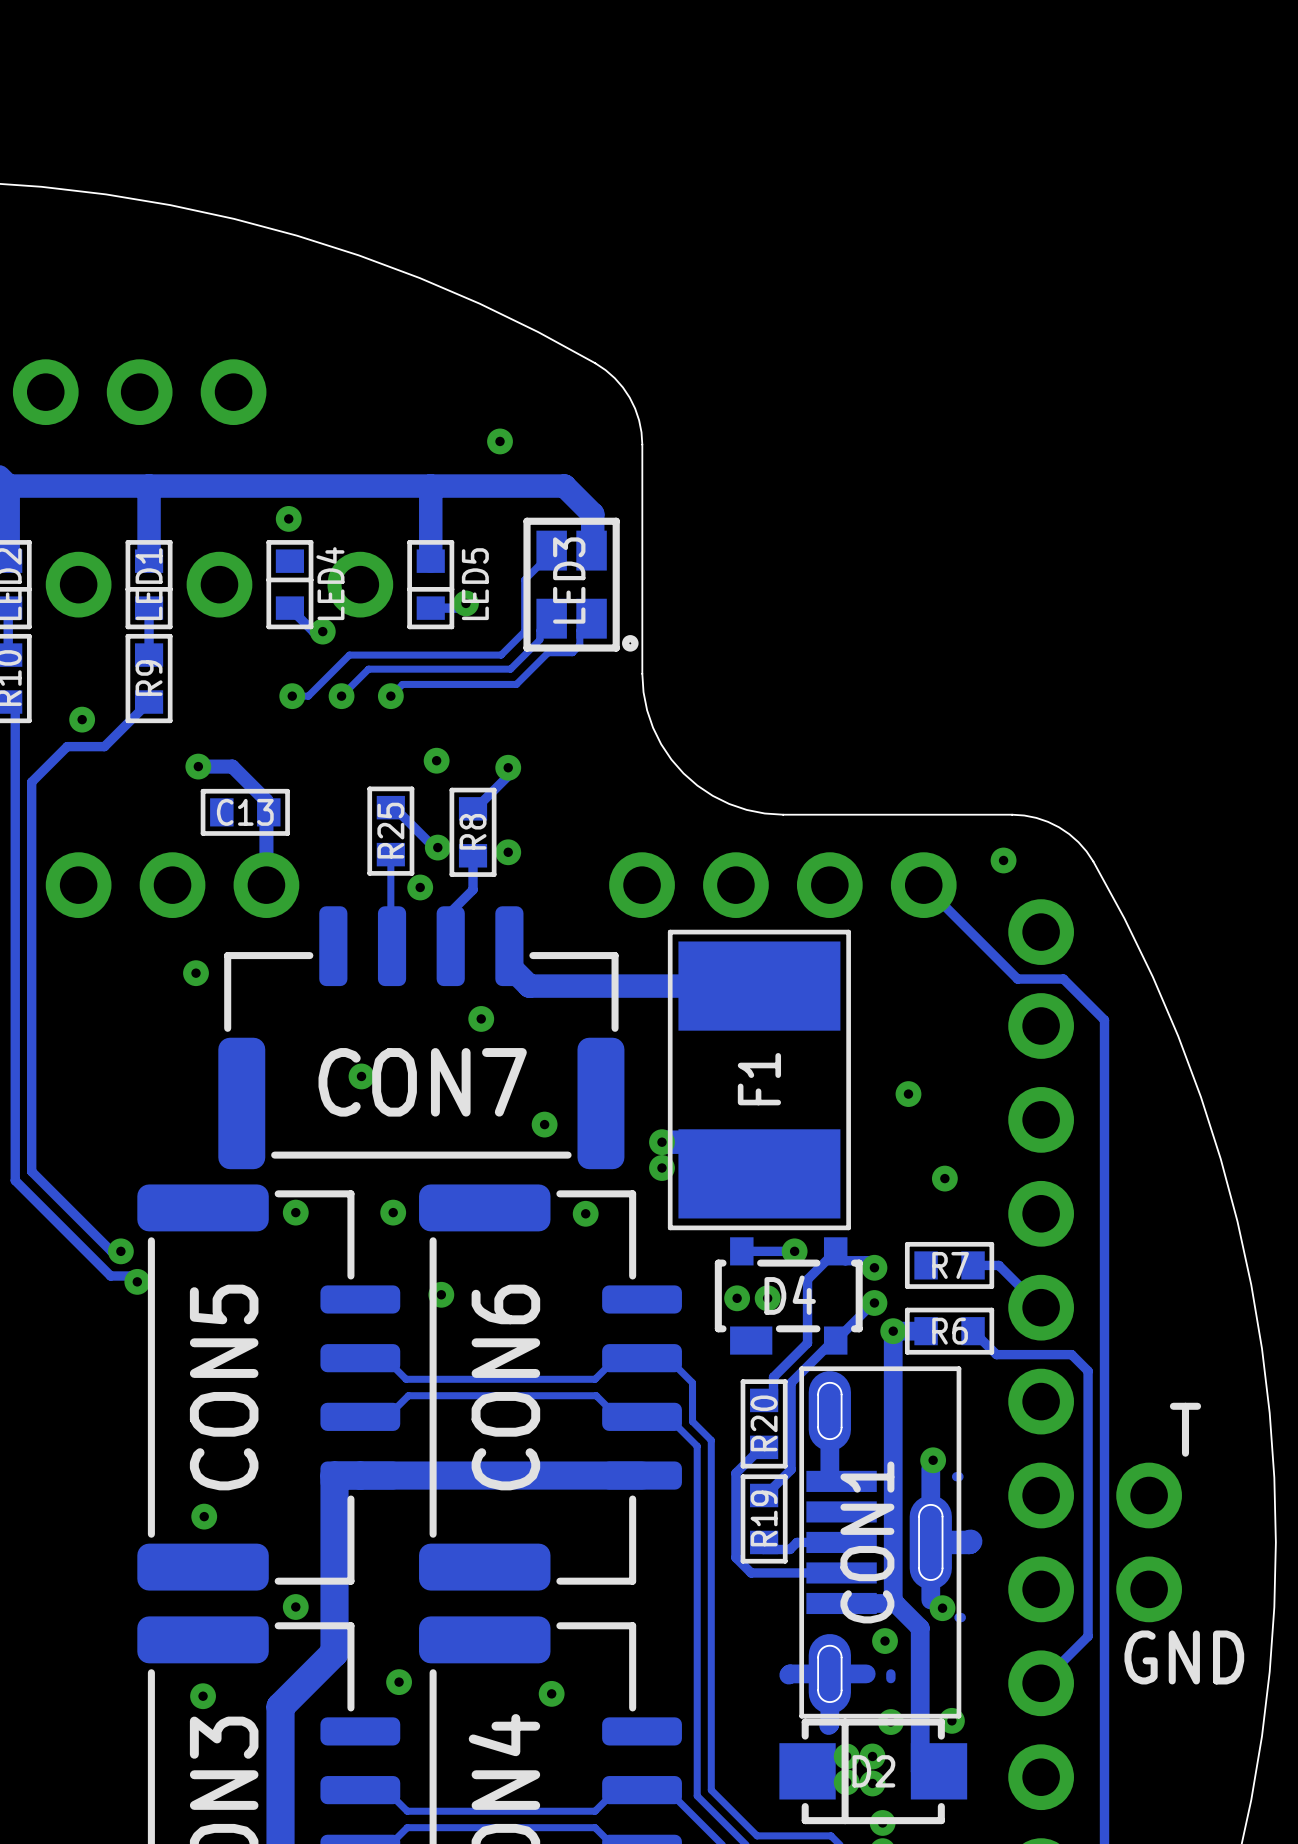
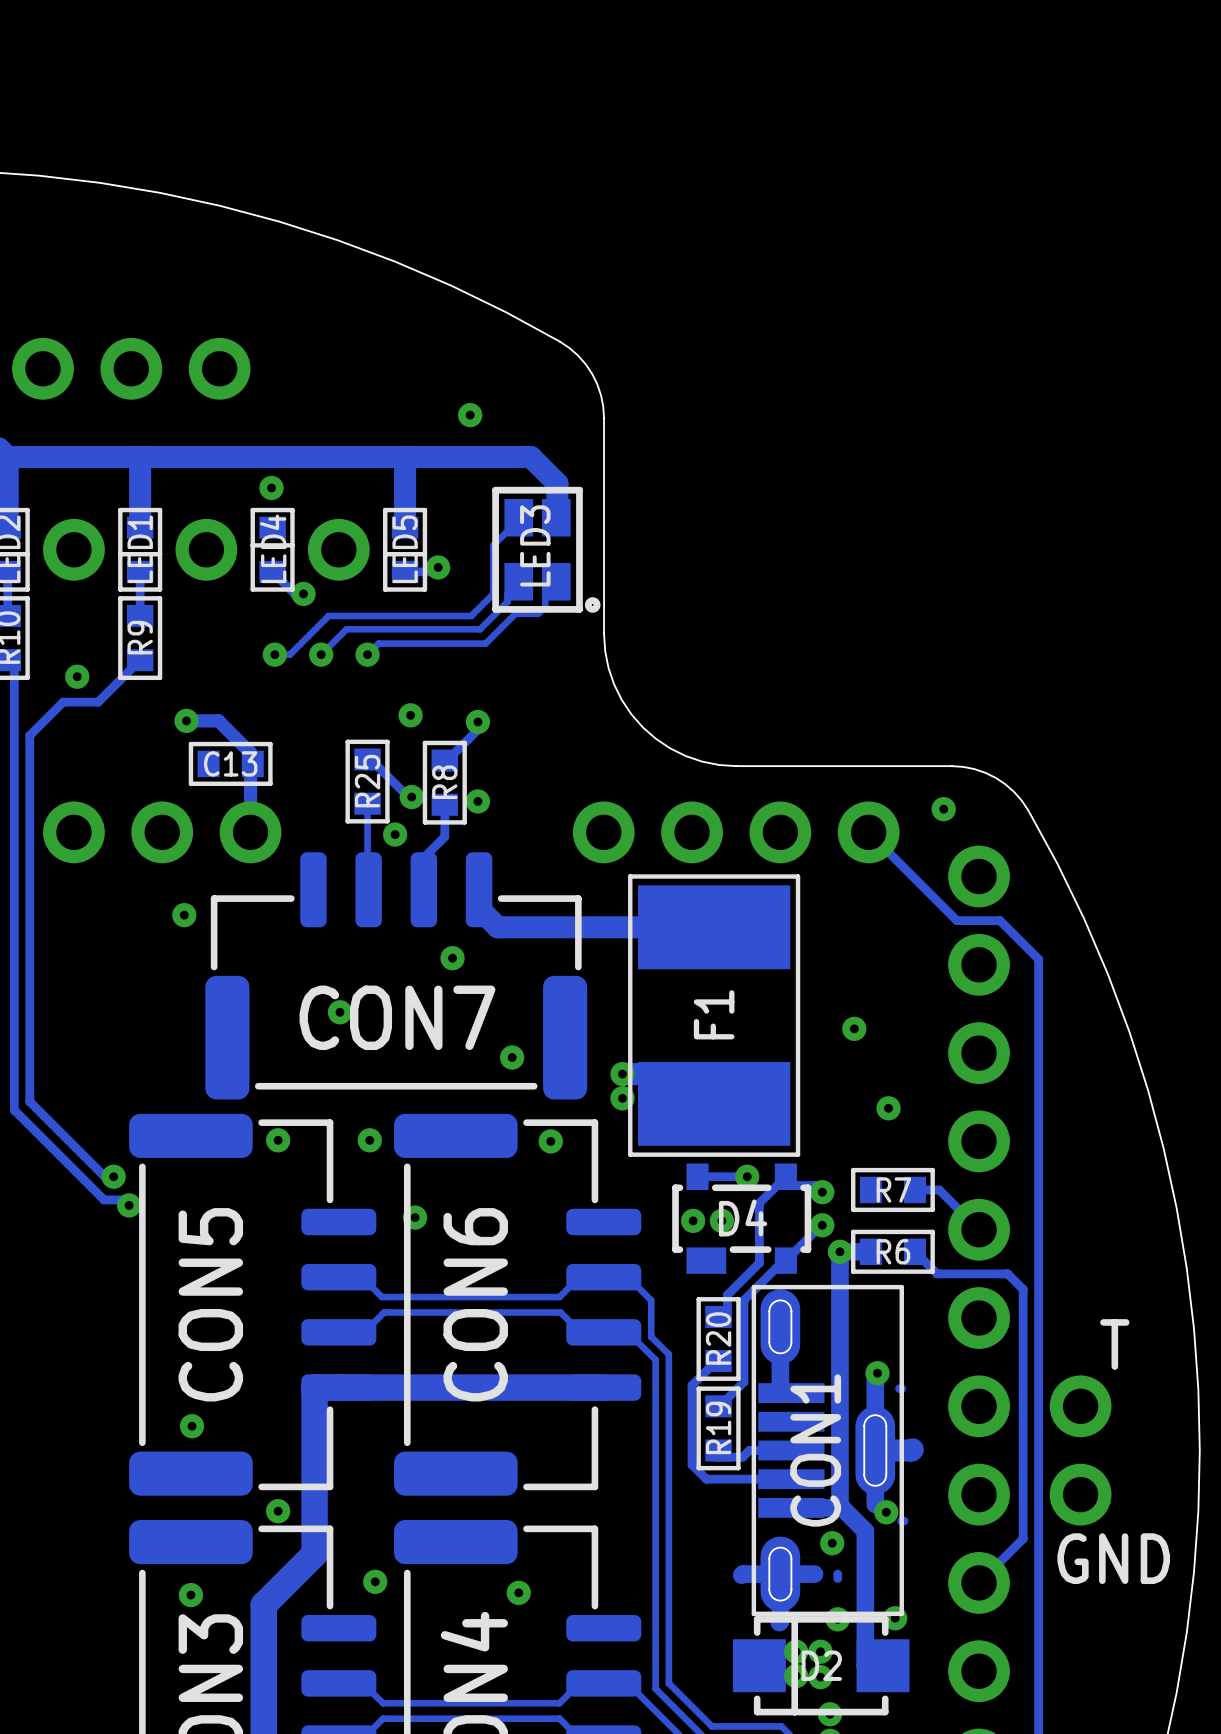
LED4 name position: LED4 (330, 583) -> LED4 (273, 548)
LED5 name position: LED5 (475, 584) -> LED5 (405, 549)

